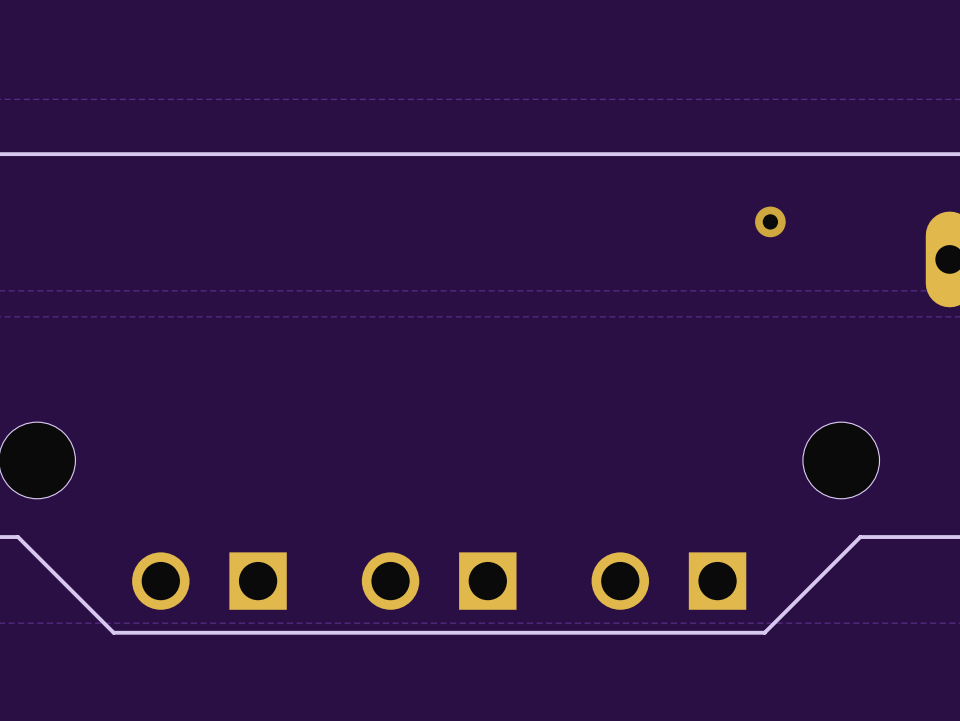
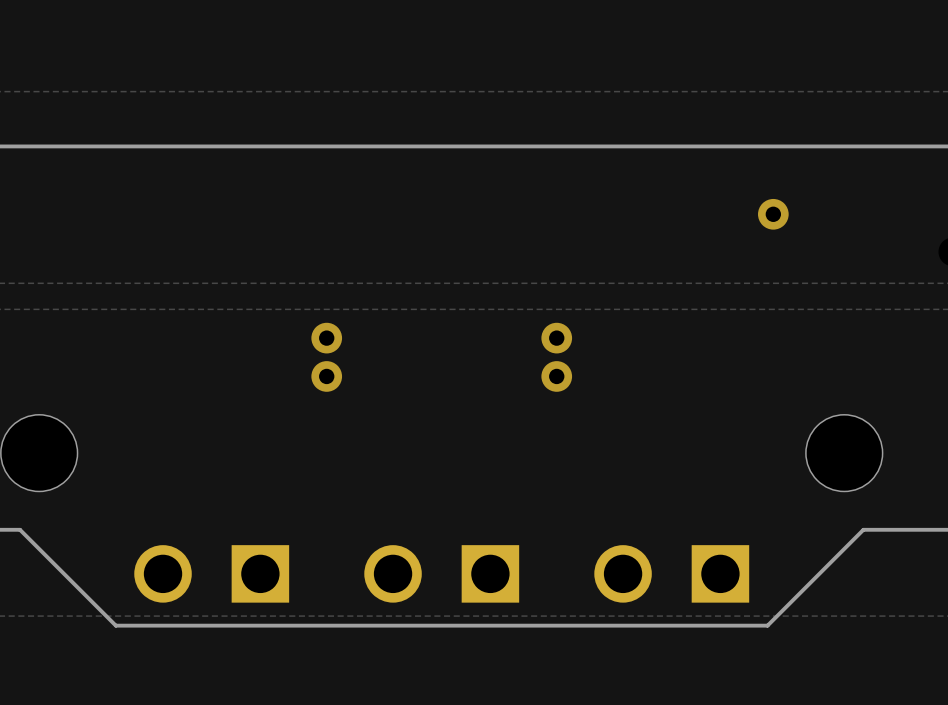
via: none -> (326, 338)
via: none -> (556, 338)
via: none -> (326, 376)
via: none -> (556, 376)

